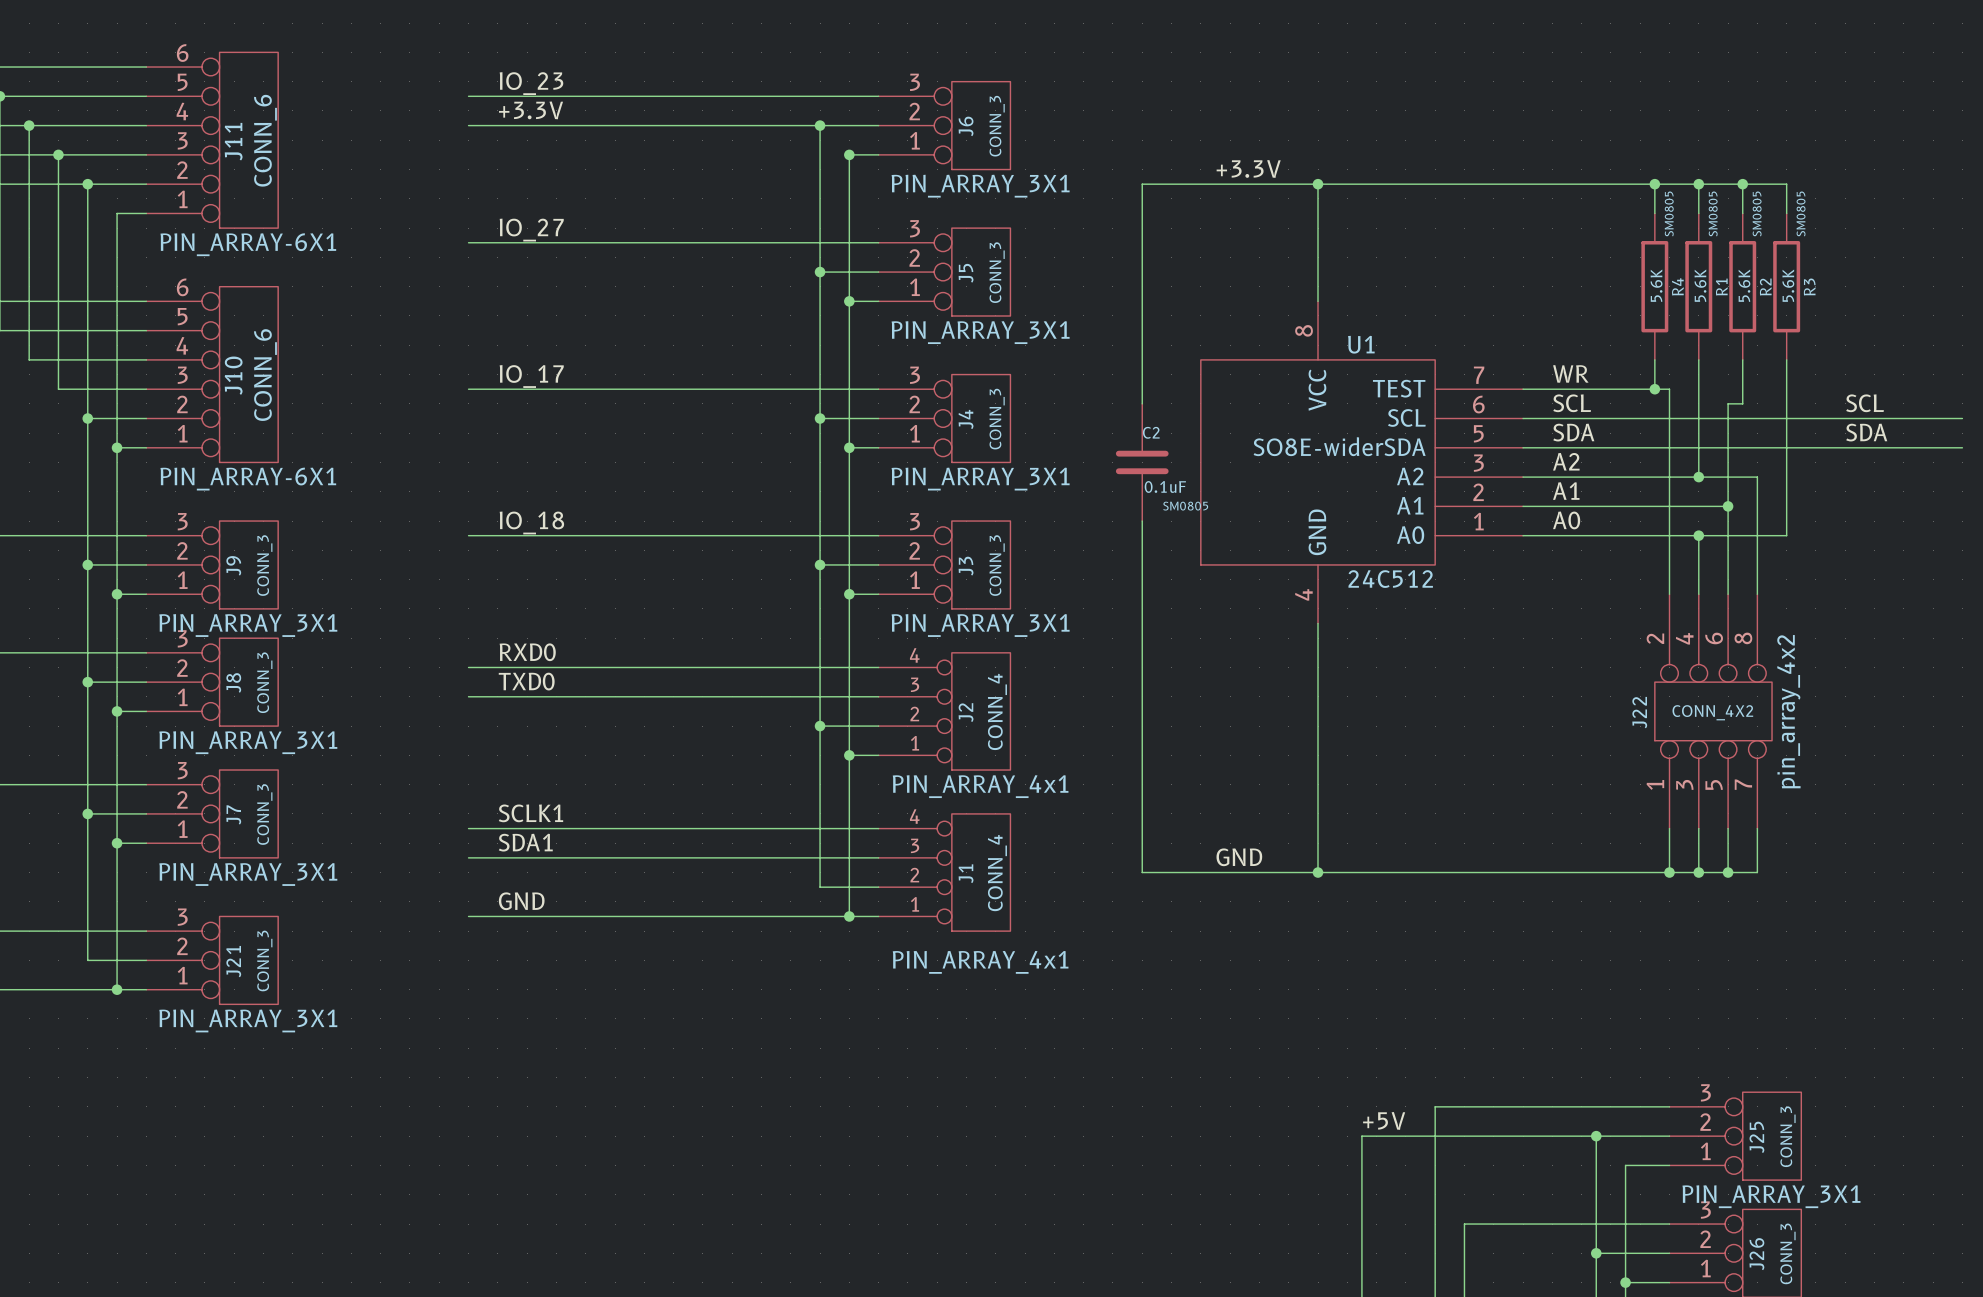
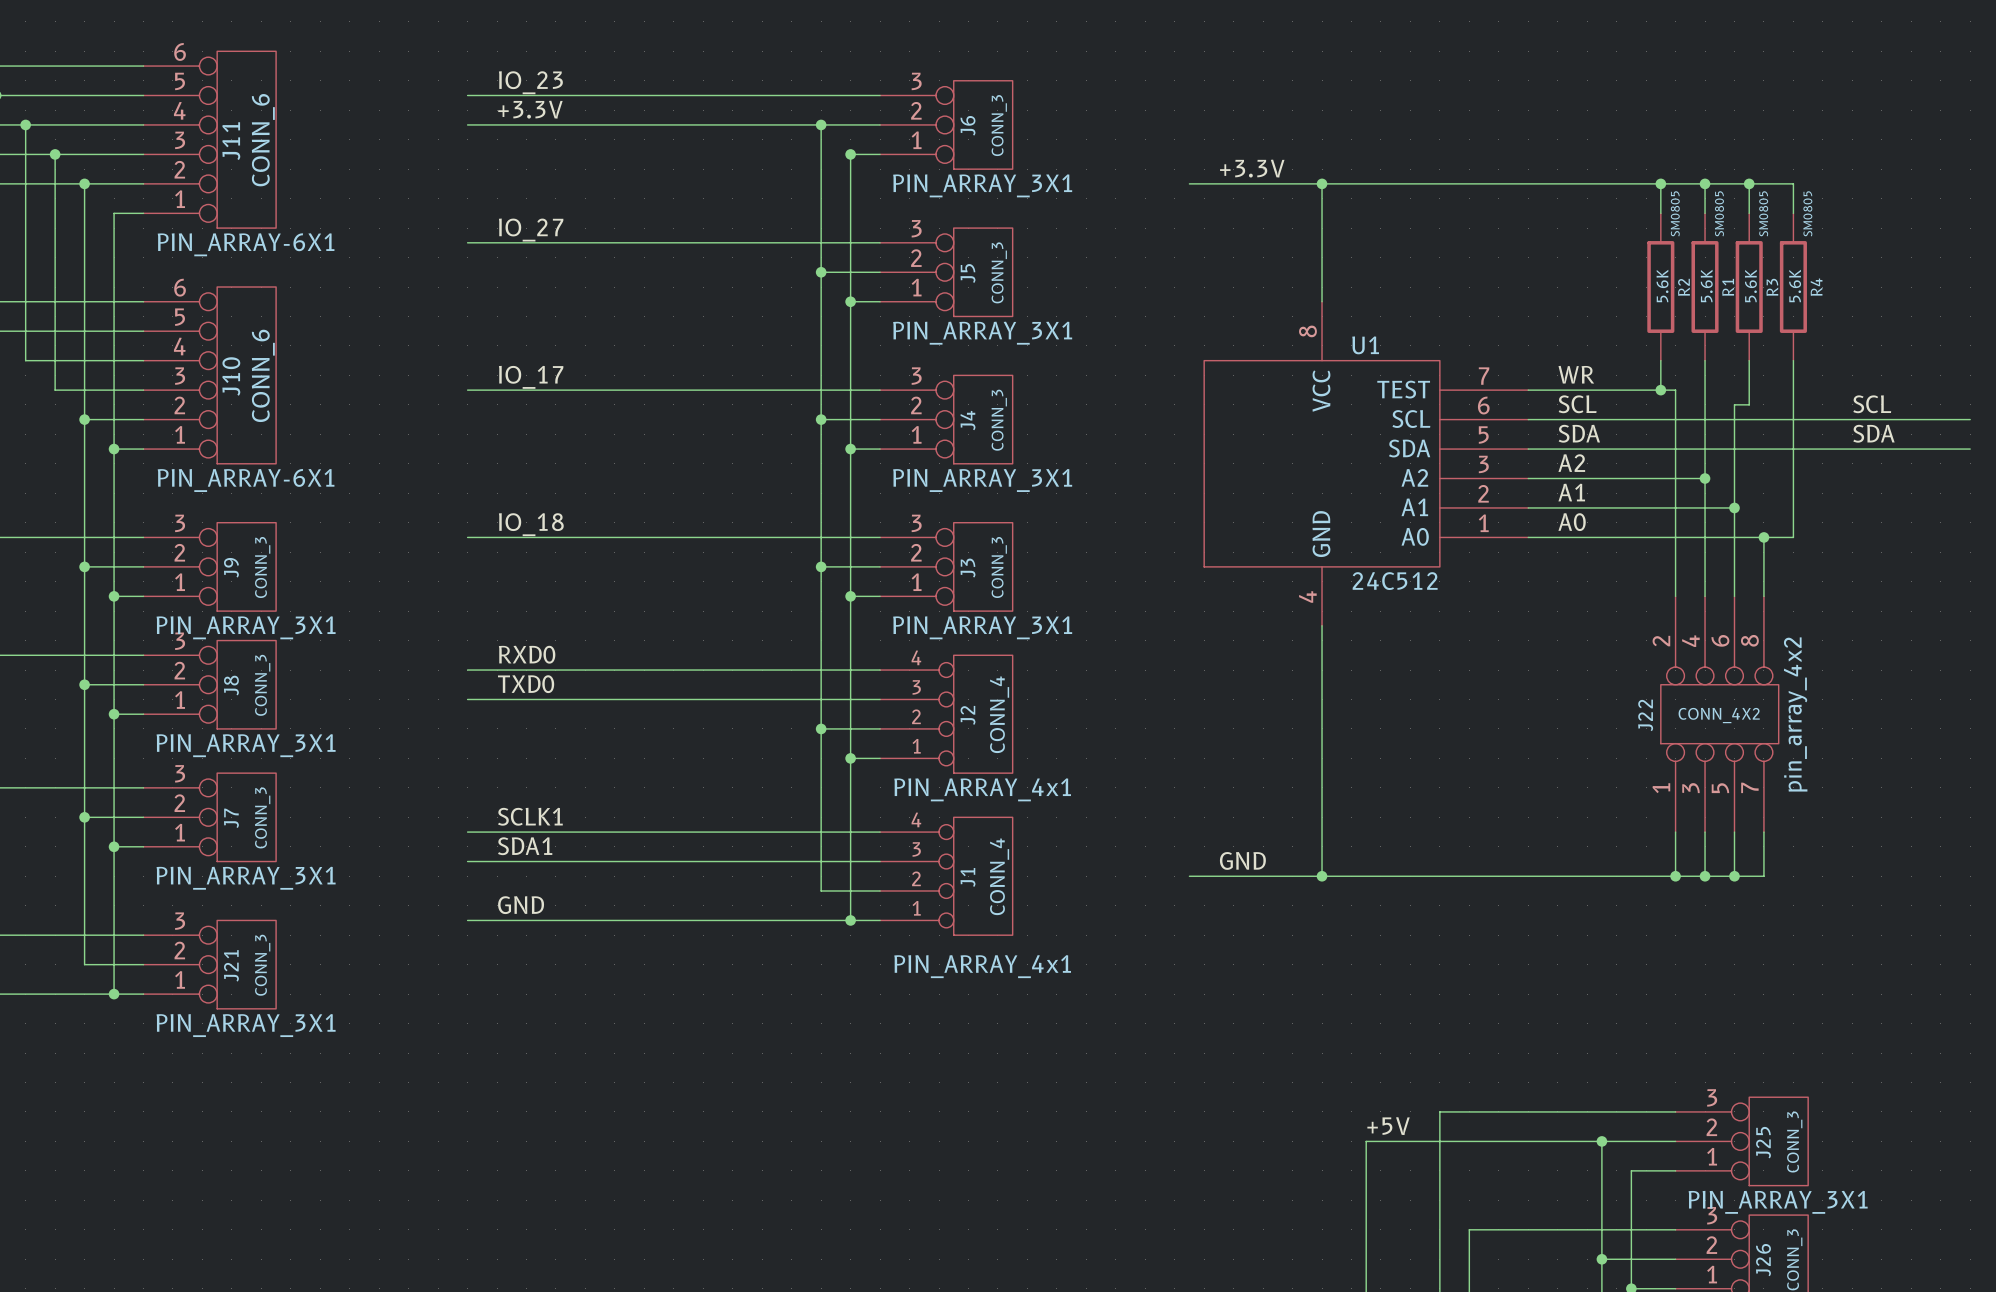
wire: (1186, 184) (1142, 184) (1142, 403) -> none
R4 name: R4 (1677, 286) -> R2 (1683, 287)
R2 name: R2 (1765, 287) -> R3 (1772, 287)
R3 name: R3 (1809, 287) -> R4 (1816, 287)
U1 text: SO8E-wider (1318, 446) -> none
C2: 0.1uF (1142, 462) -> none
wire: (1698, 477) (1757, 477) (1757, 535) -> (1705, 478) (1705, 537)
wire: (1142, 521) (1142, 872) (1186, 872) -> none
junction position: (1698, 535) -> (1763, 537)

